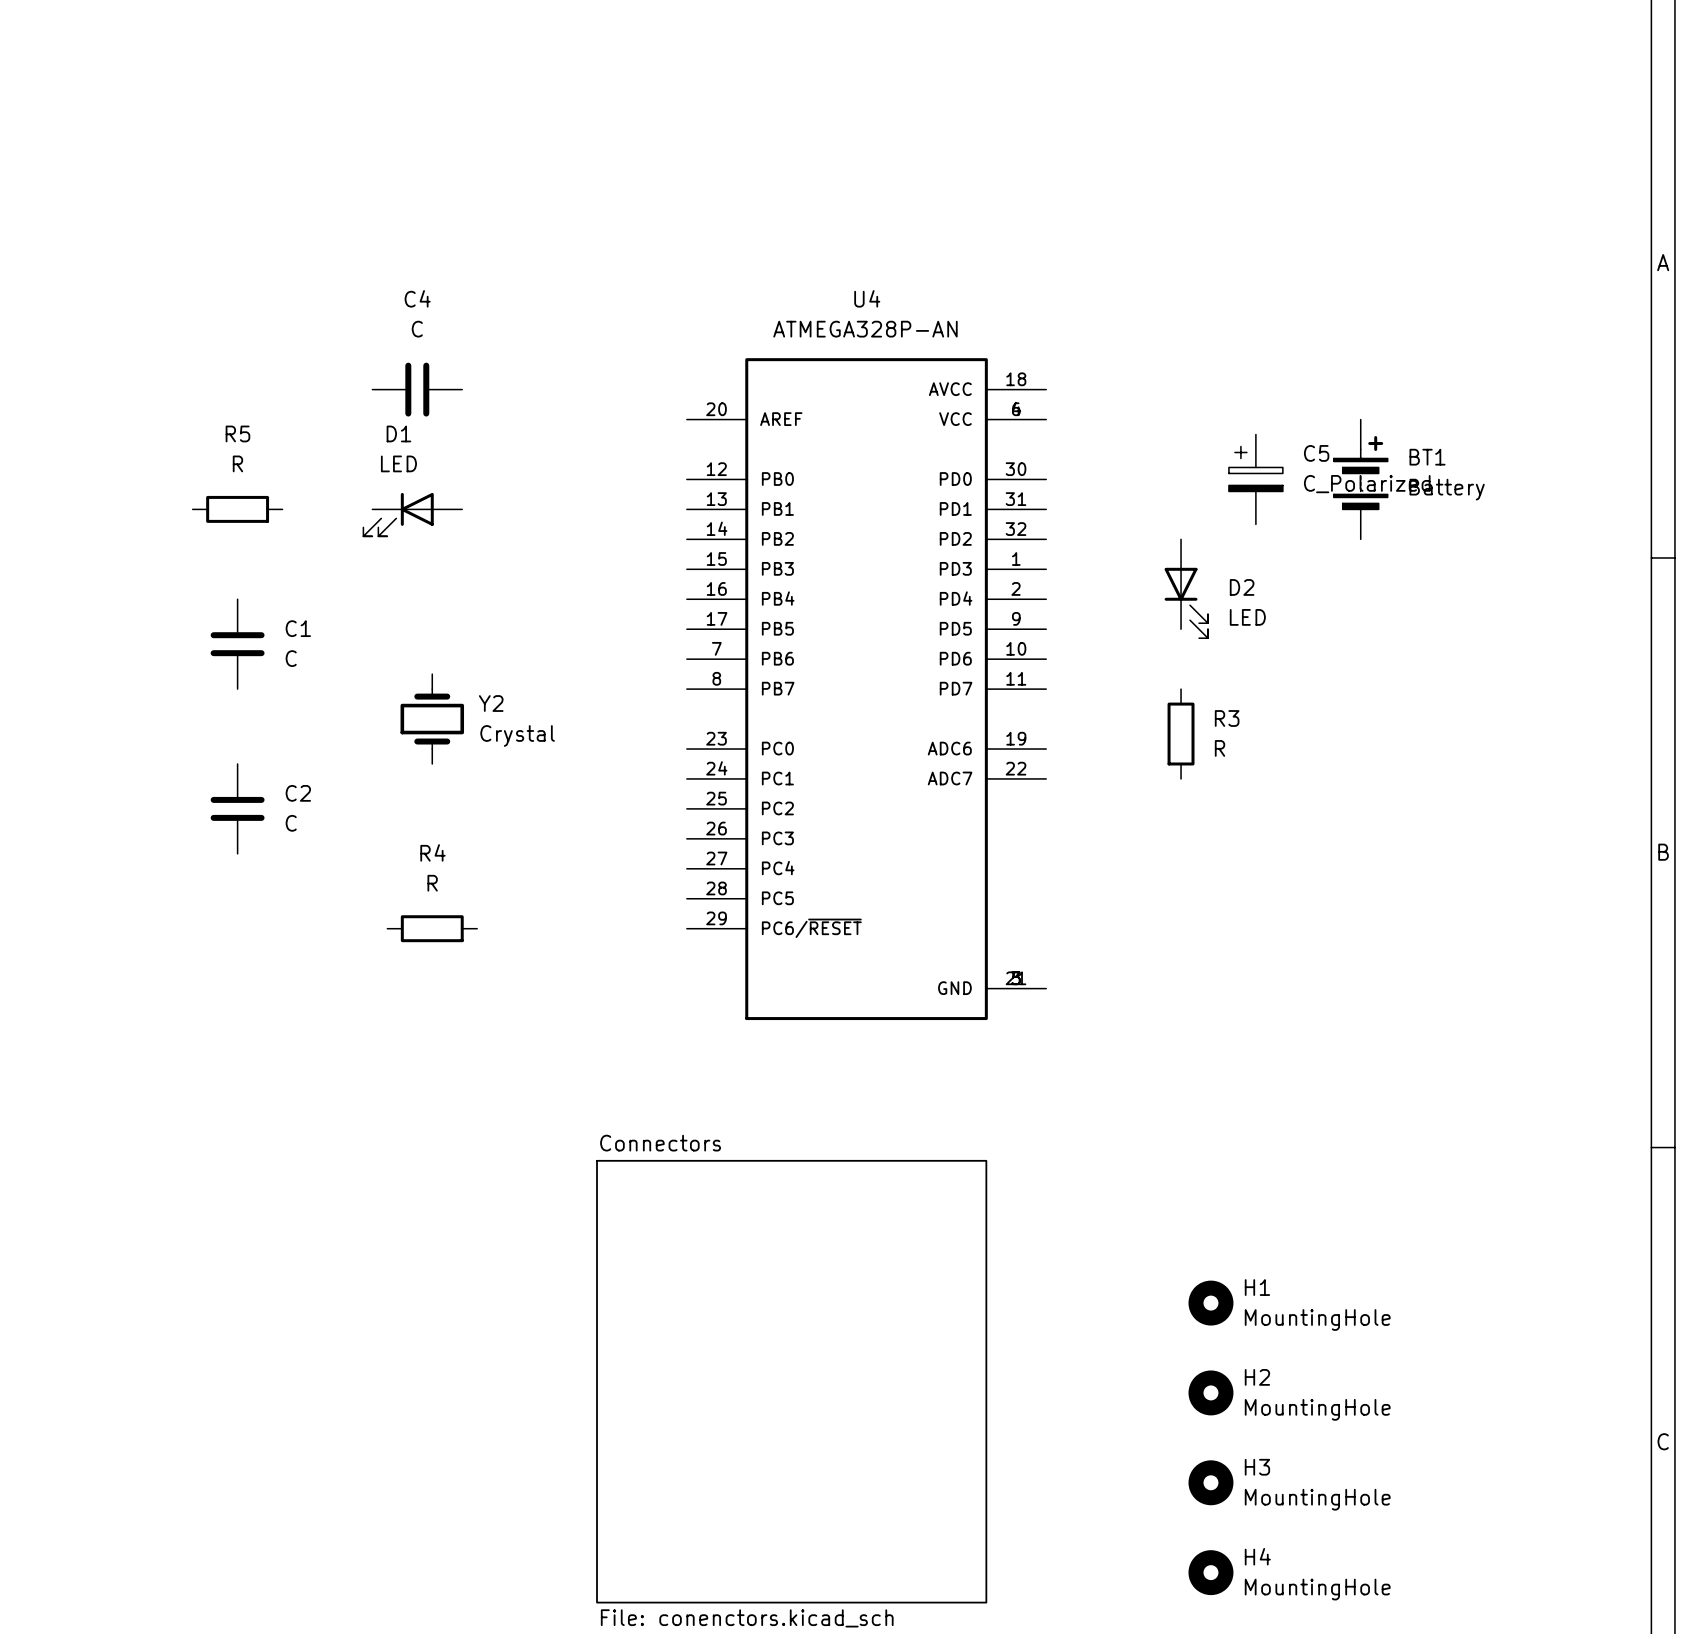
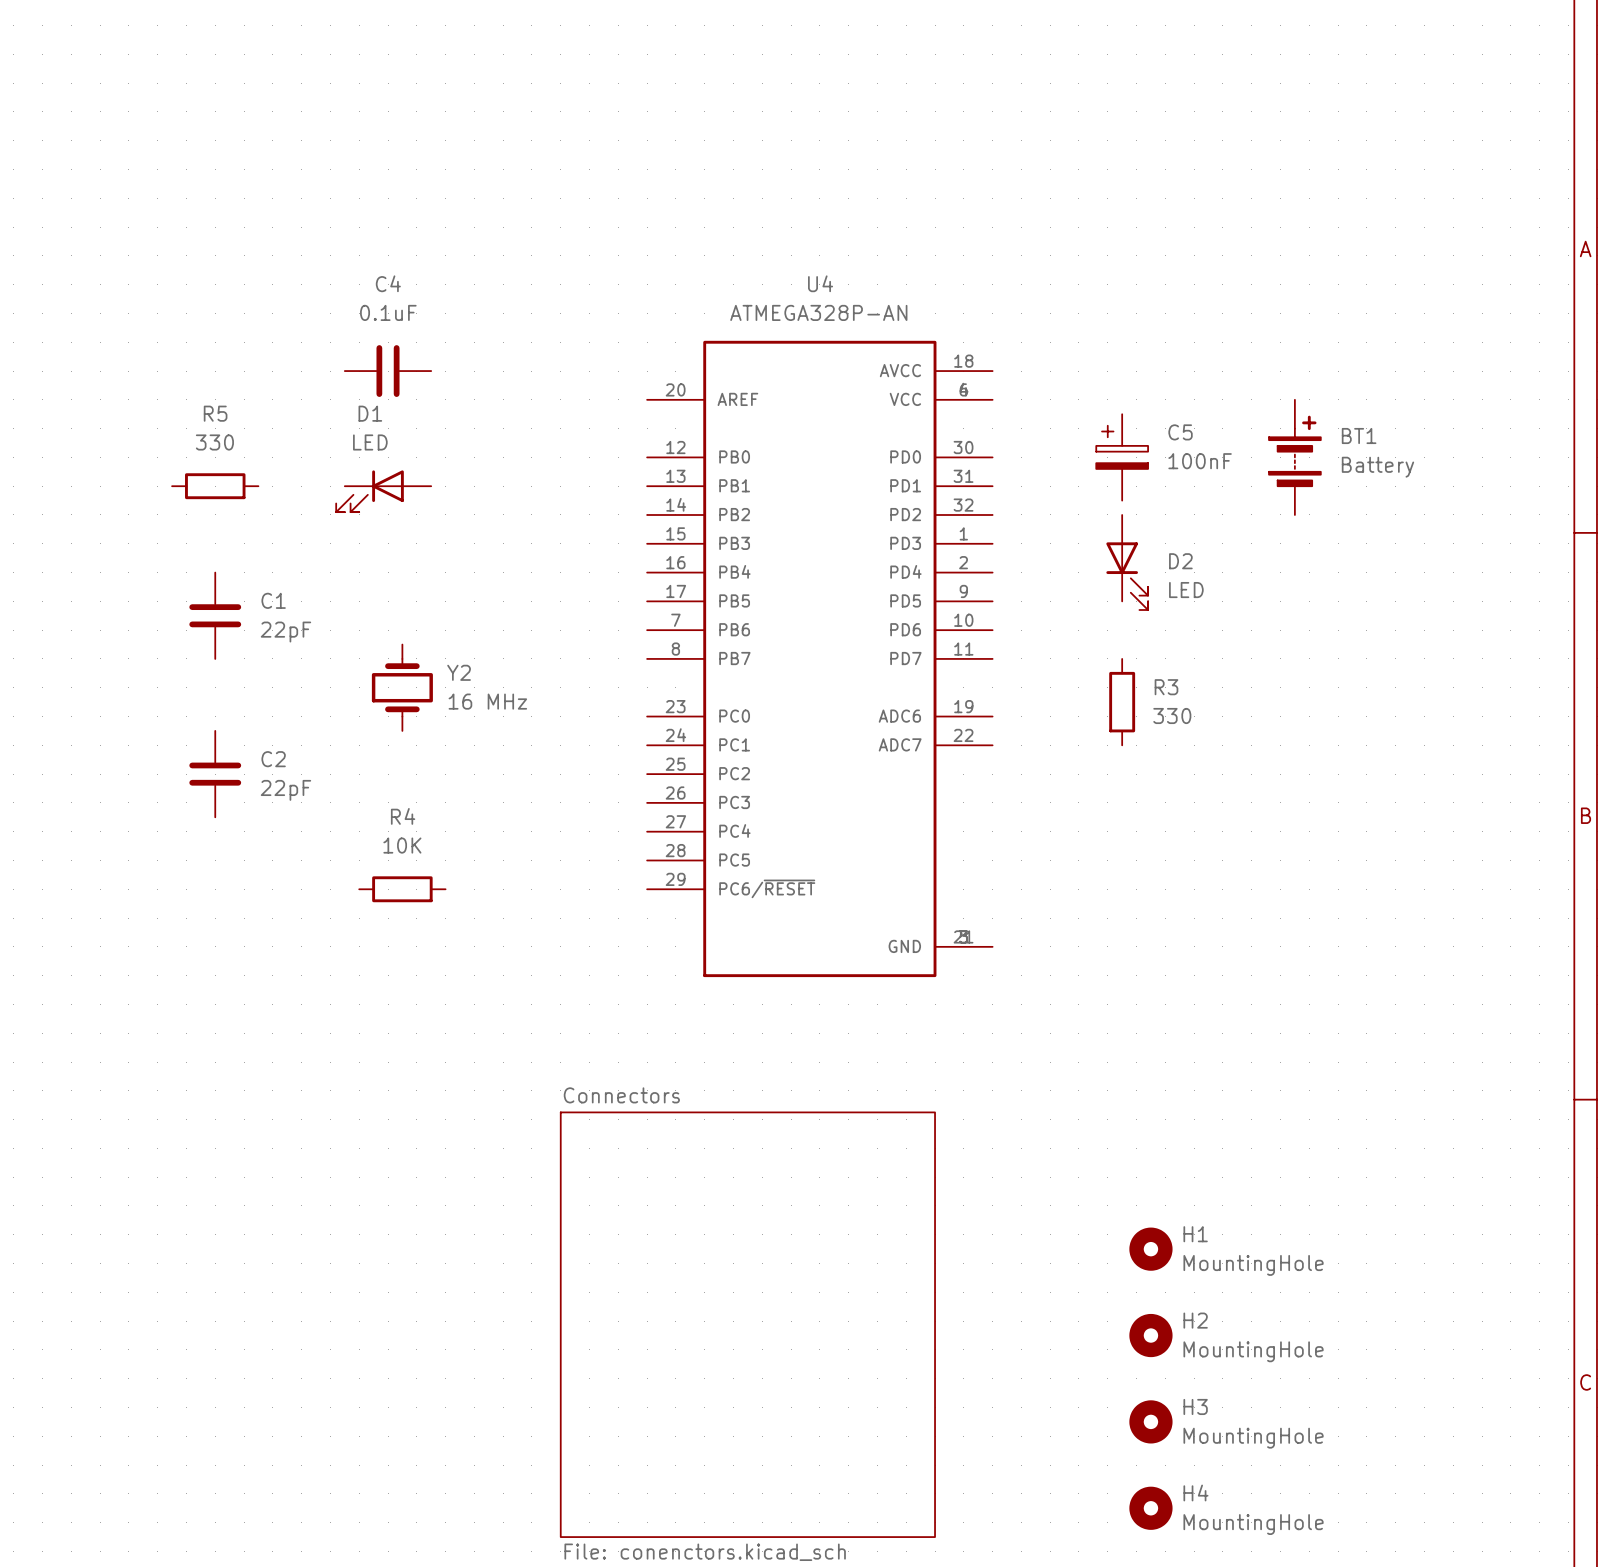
C4 value: C (417, 329) -> 0.1uF (388, 312)
R5 value: R (237, 463) -> 330 (214, 442)
C5 position: (1255, 479) -> (1122, 457)
C5 value: C_Polarized (1367, 484) -> 100nF (1200, 461)
C1 value: C (291, 658) -> 22pF (285, 632)
Y2 value: Crystal (517, 735) -> 16 MHz (487, 701)
R3 value: R (1220, 748) -> 330 (1172, 715)
C2 value: C (291, 823) -> 22pF (285, 790)
R4 value: R (432, 883) -> 10K (402, 845)

